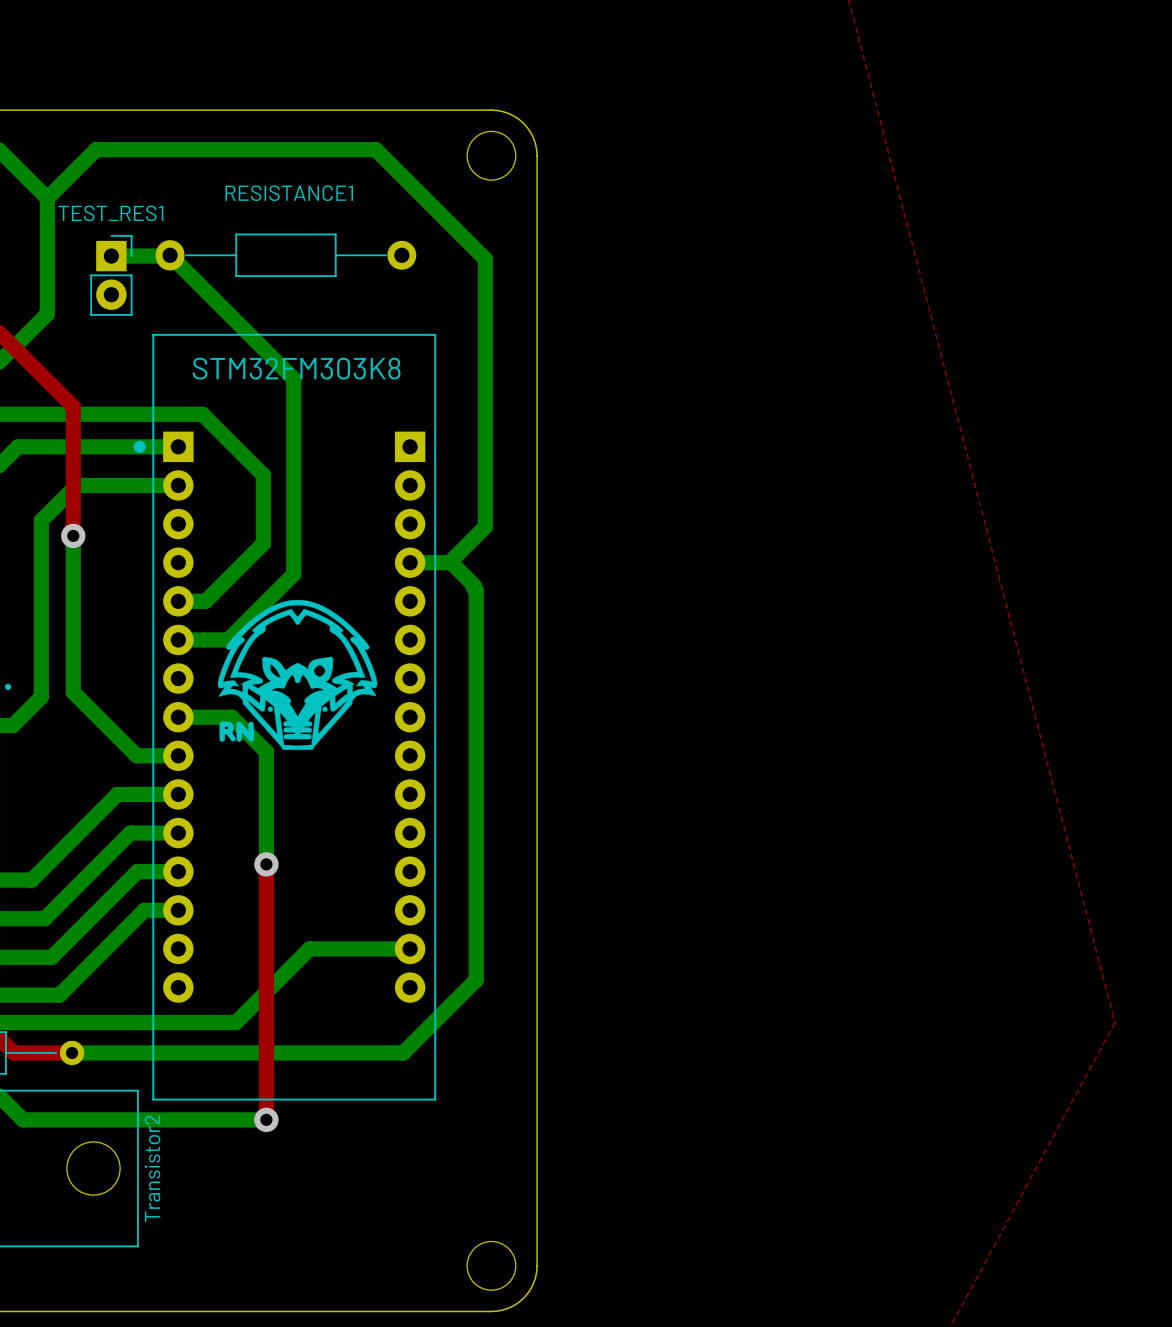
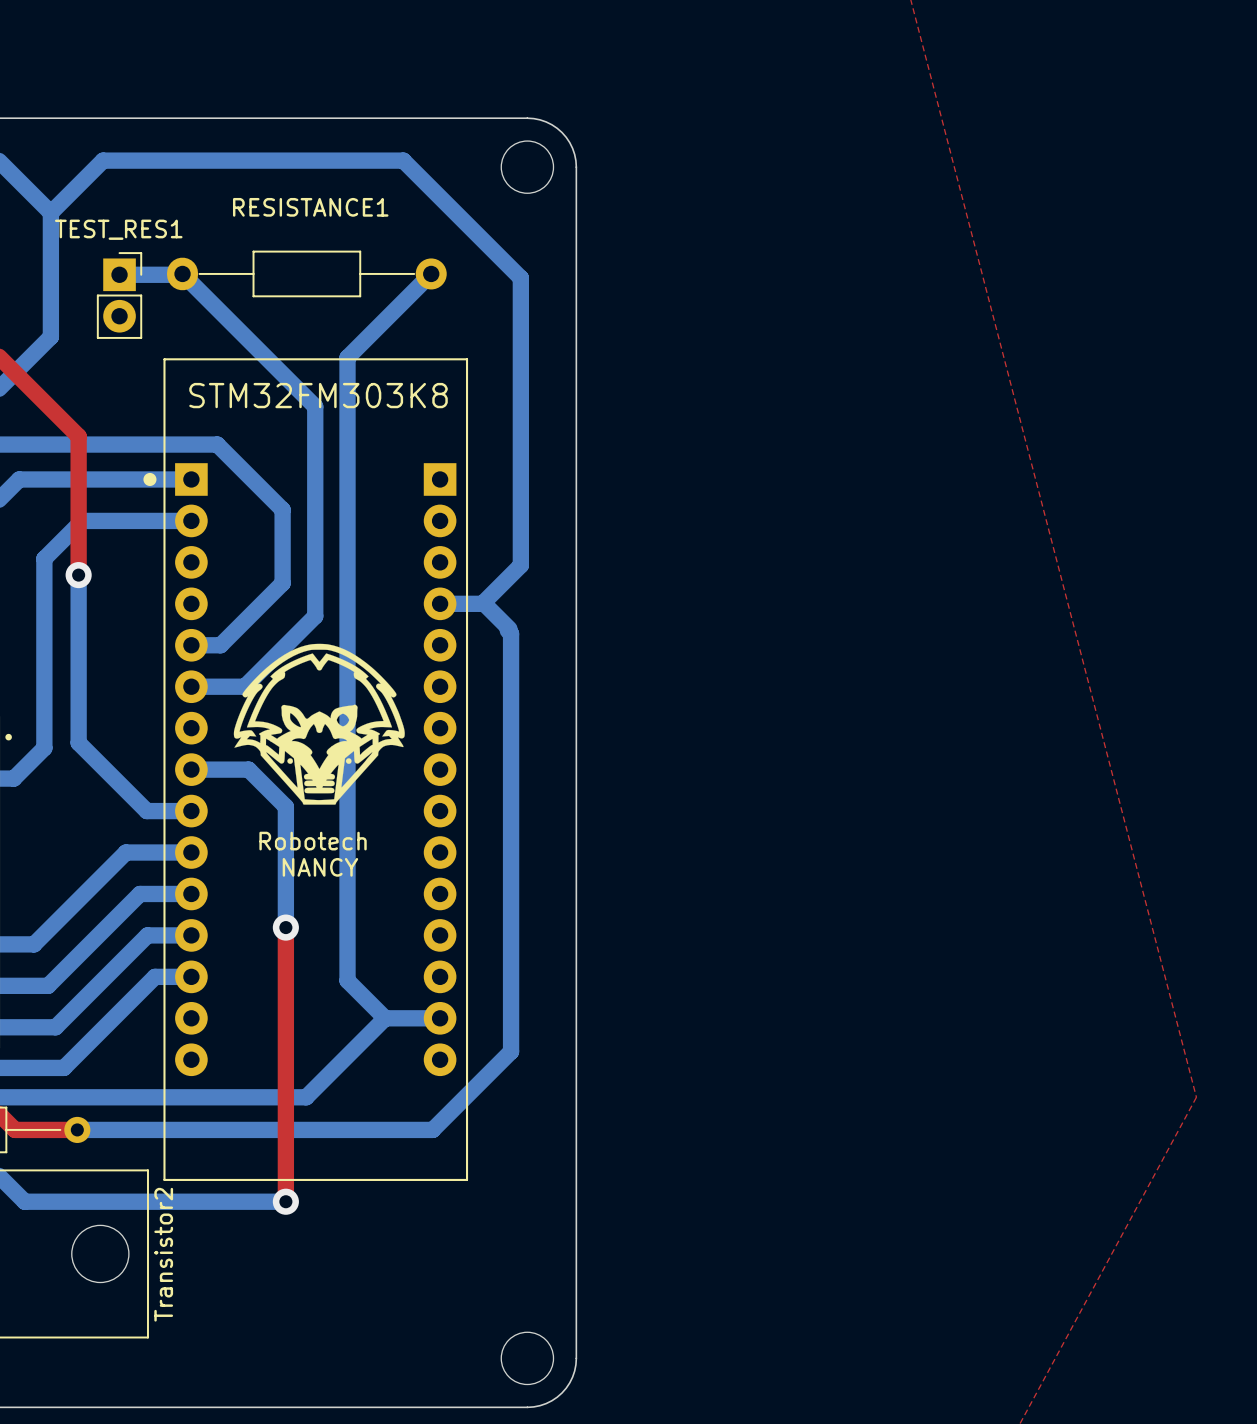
drawing shape: [217, 599, 378, 750] -> [233, 643, 405, 805]
text: none -> Robotech (313, 841)
text: none -> NANCY (320, 867)
bottom track: (358, 948) (309, 948) (235, 1022) -> (431, 273) (347, 357) (347, 980) (385, 1018) (306, 1097) (253, 1097)

